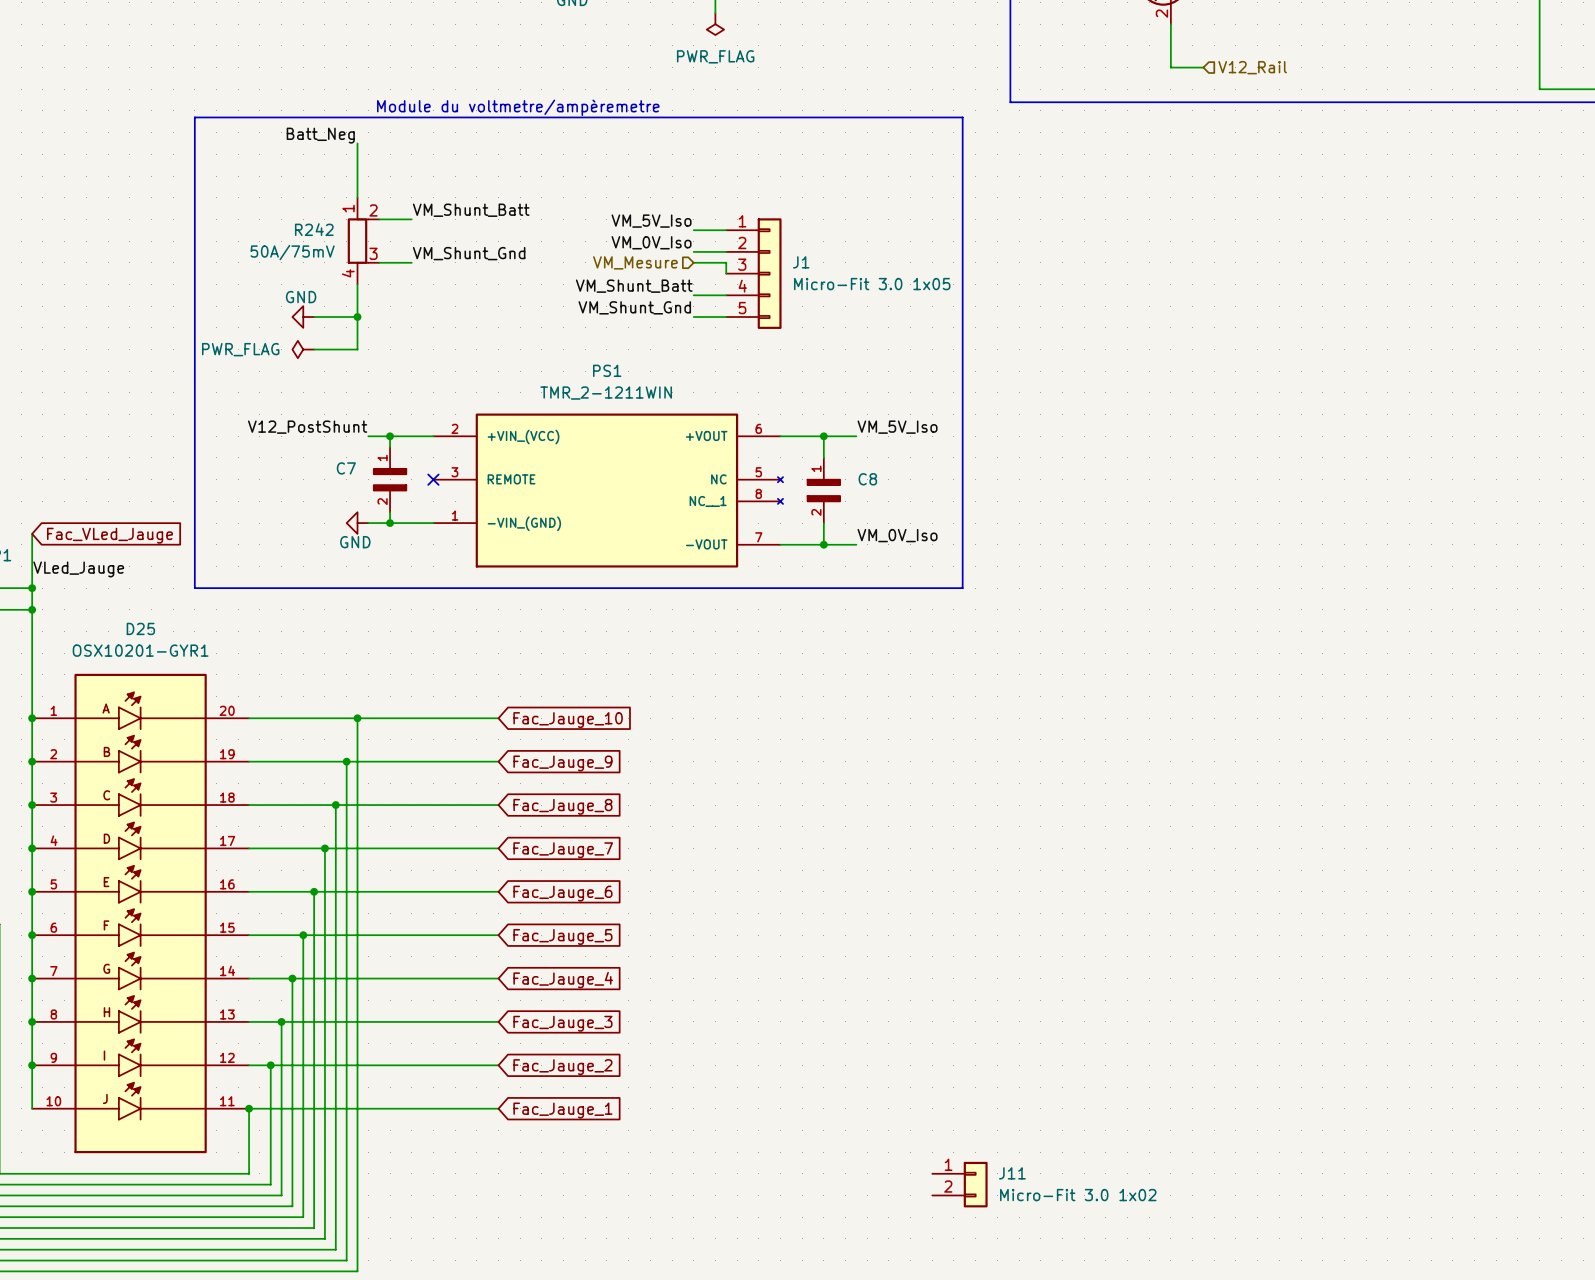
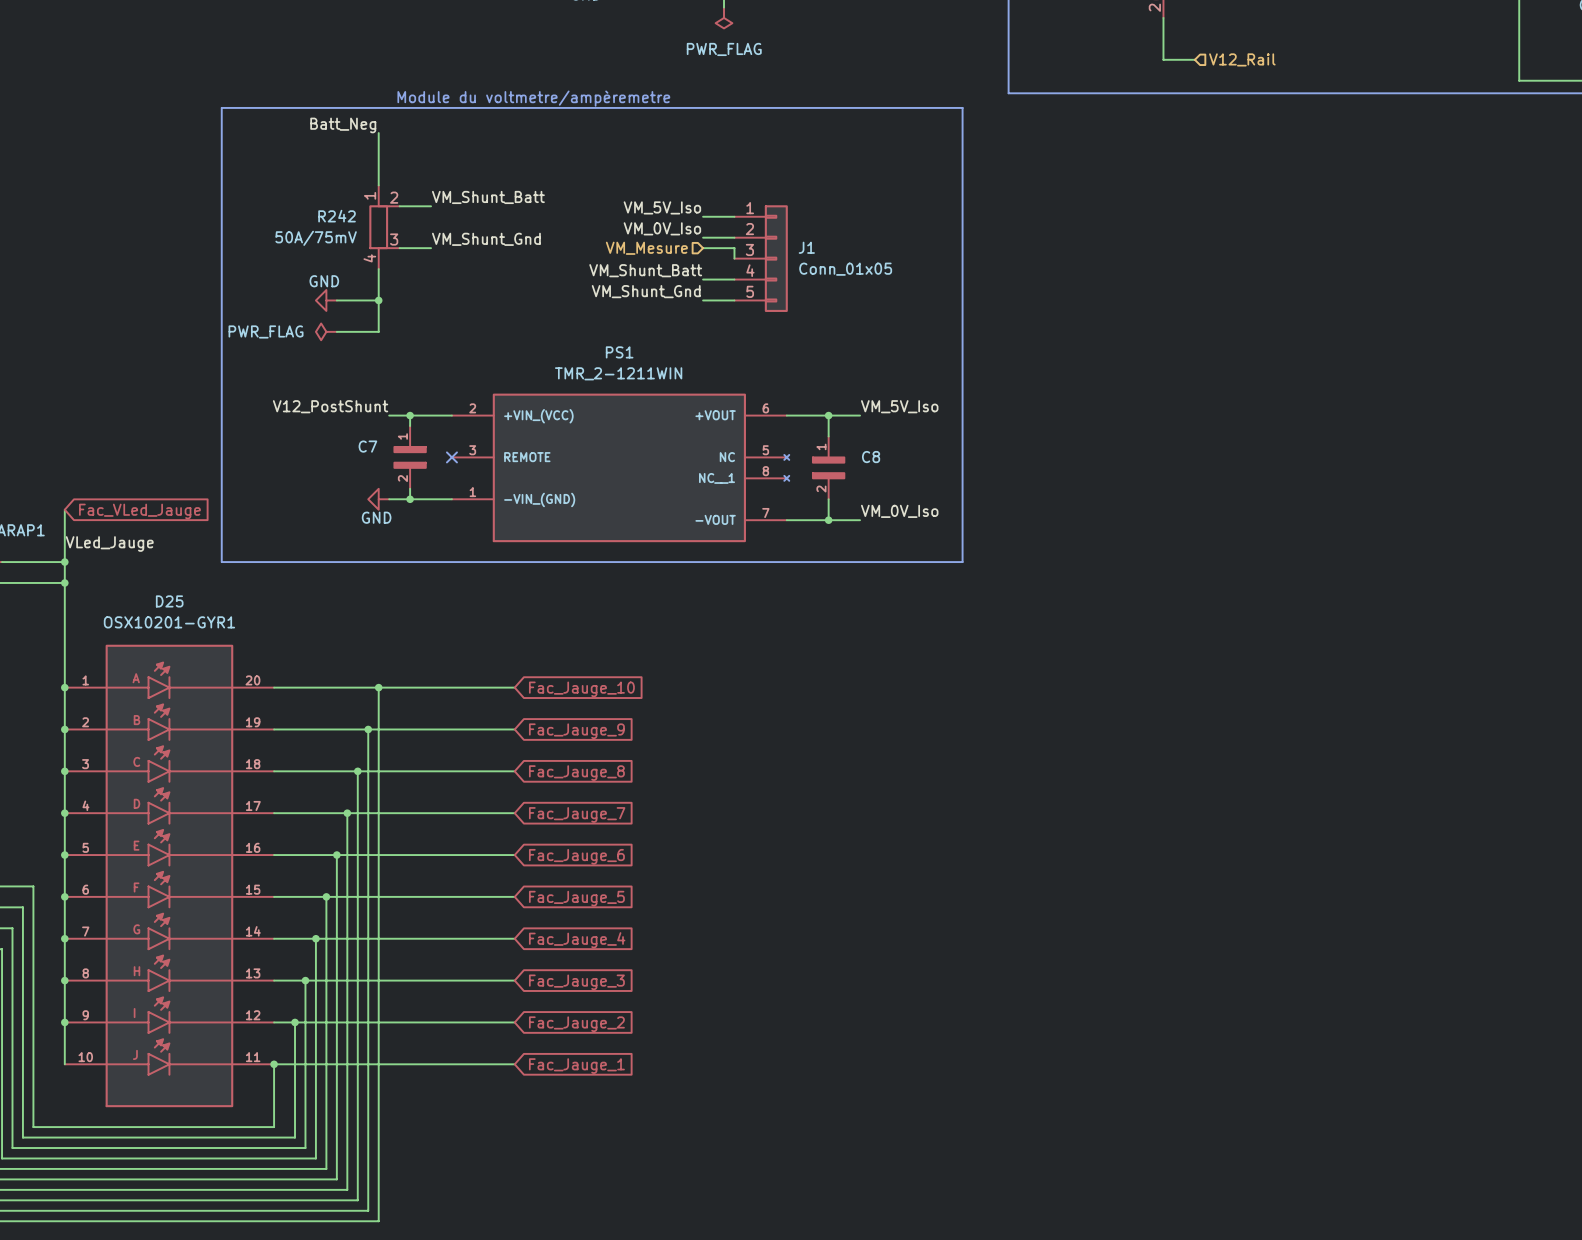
J1 value: Micro-Fit 3.0 1x05 (872, 284) -> Conn_01x05 (845, 269)
J11: Micro-Fit 3.0 1x02 (959, 1184) -> none

